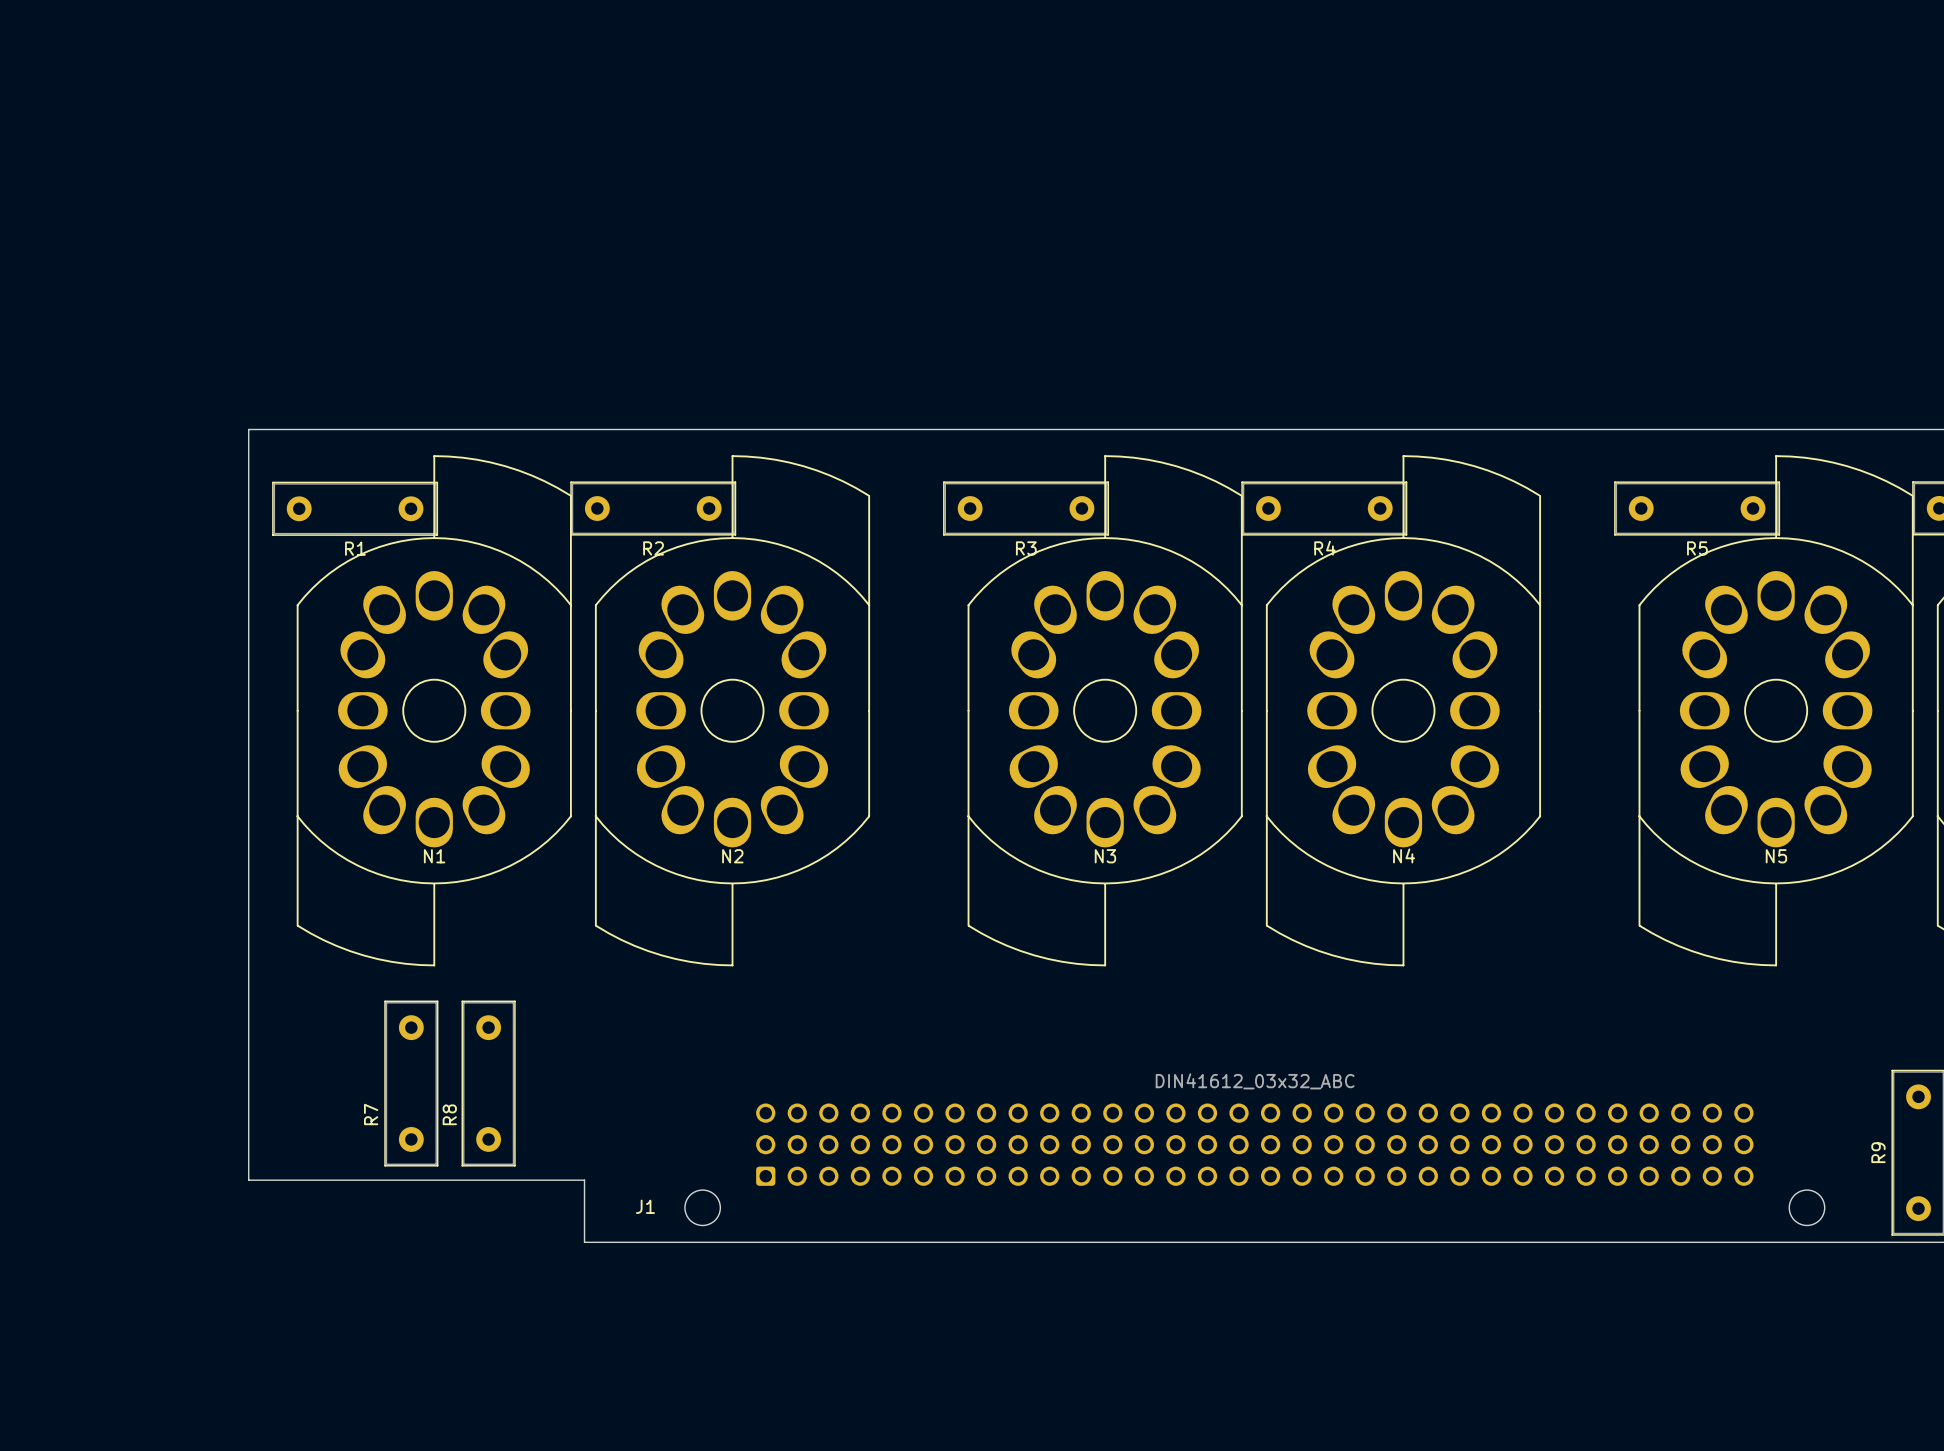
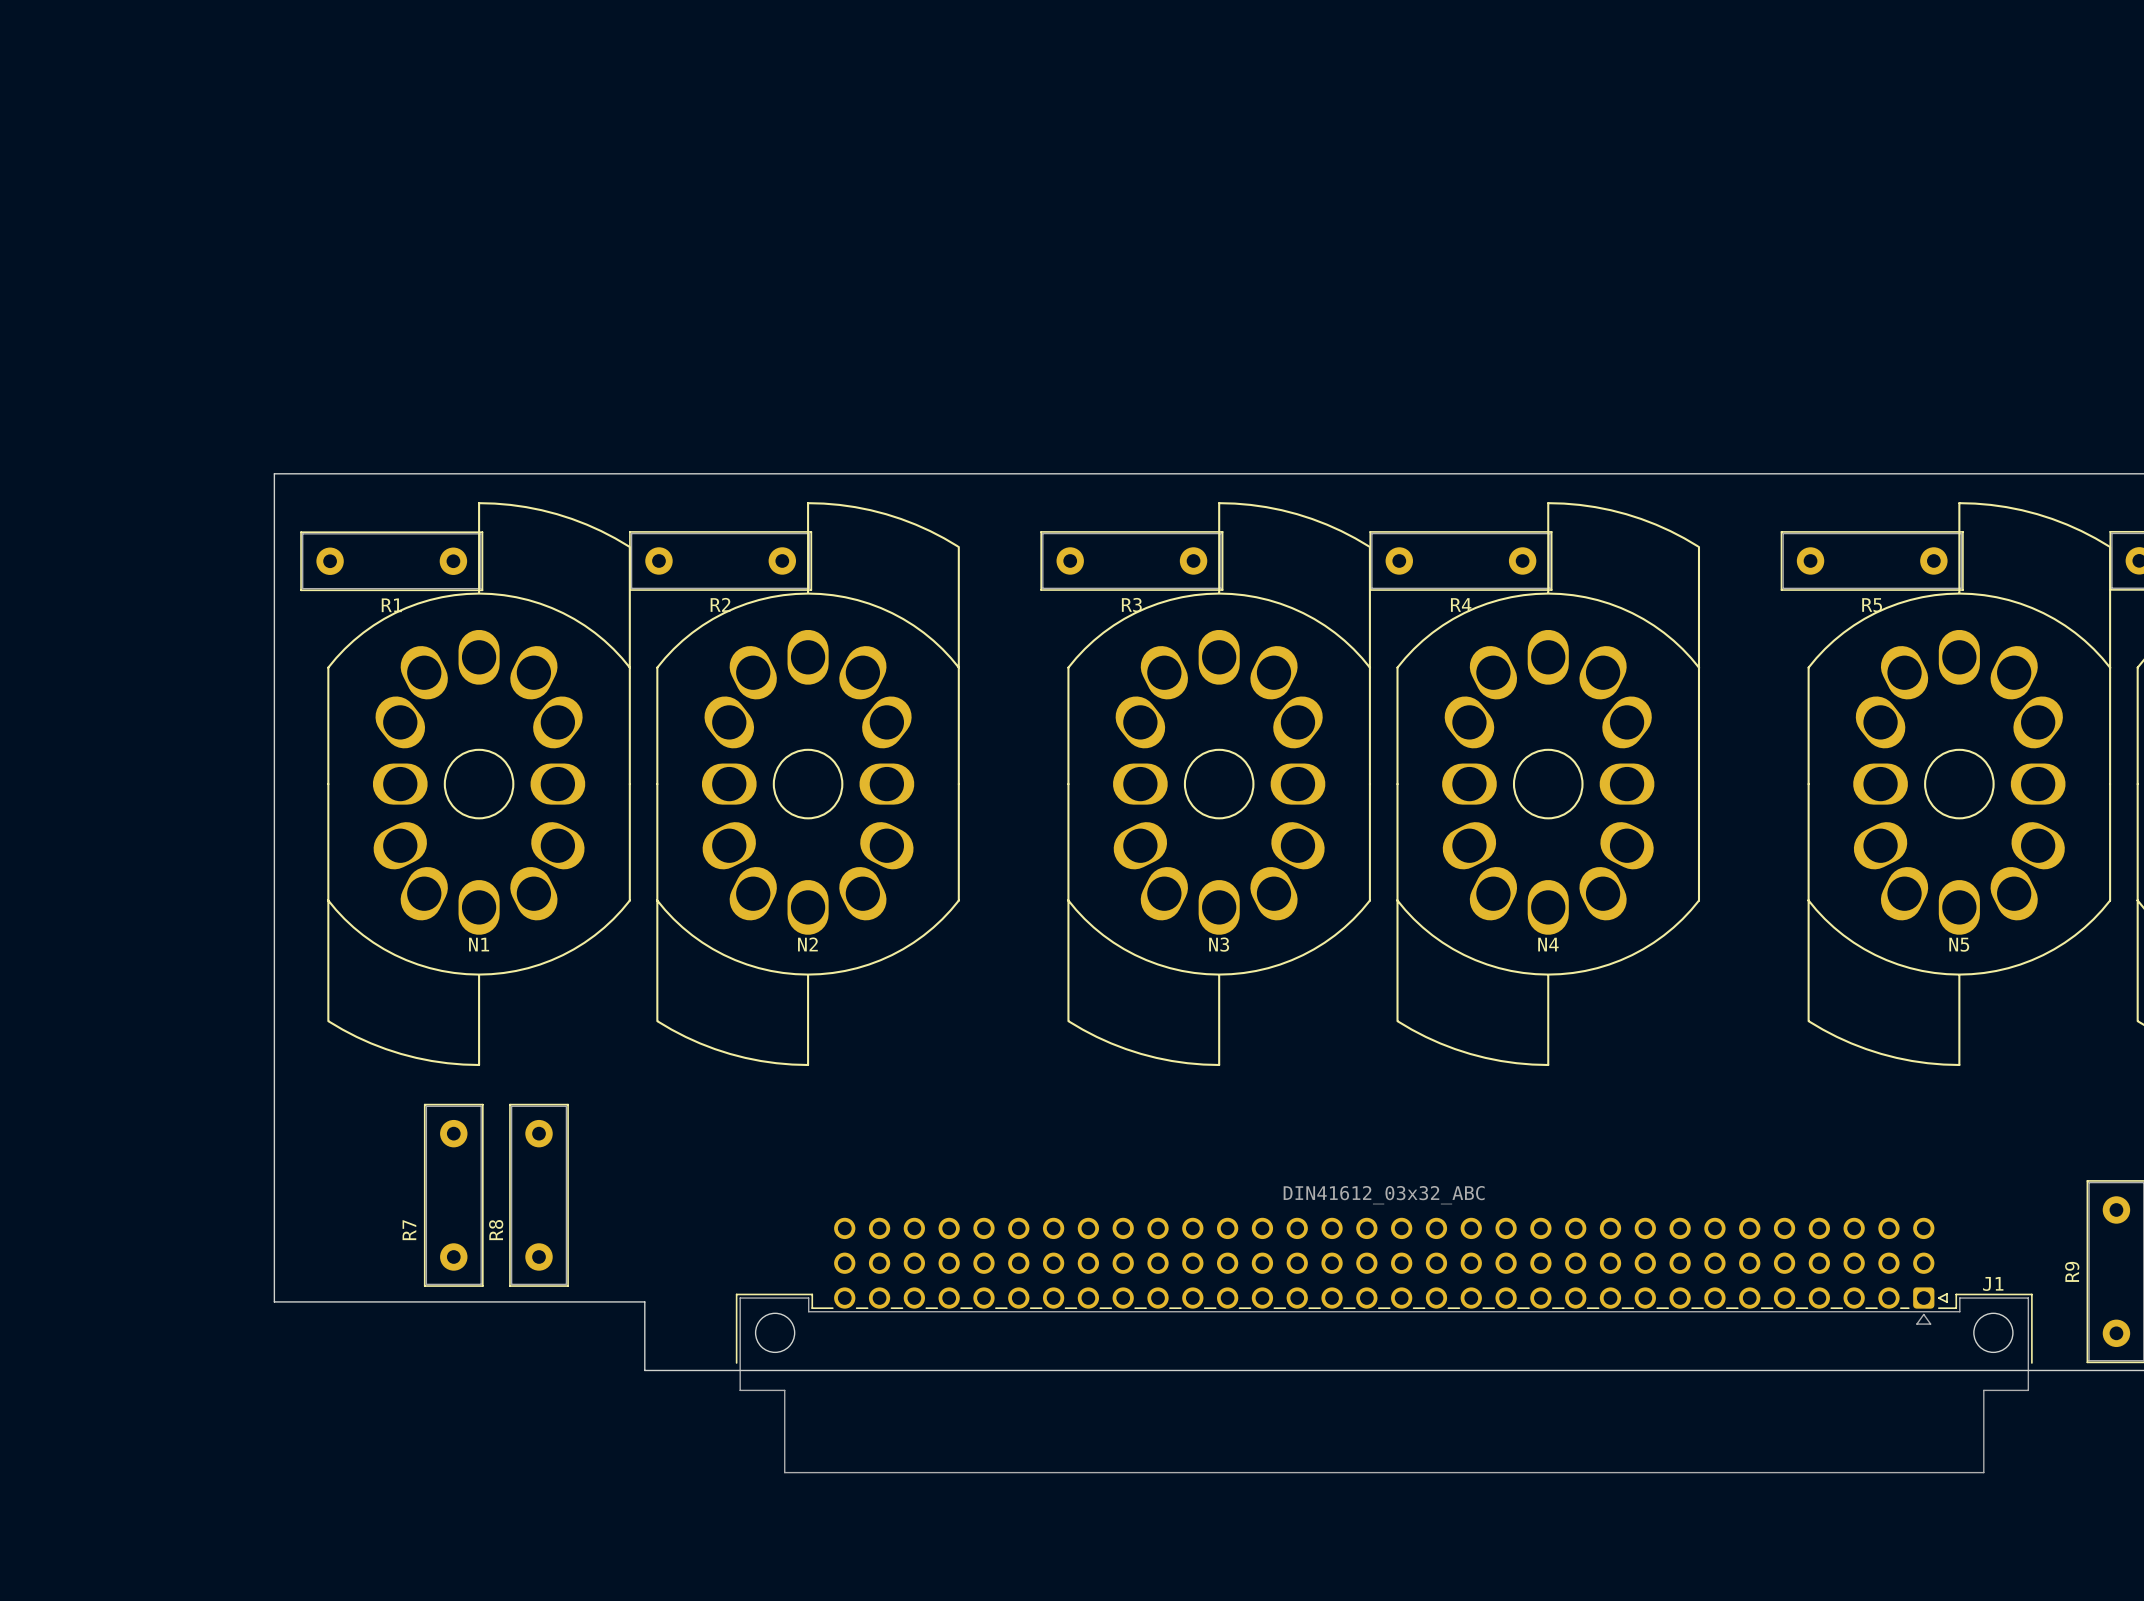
J1 side: bottom (1254, 1164) -> top (1384, 1345)

